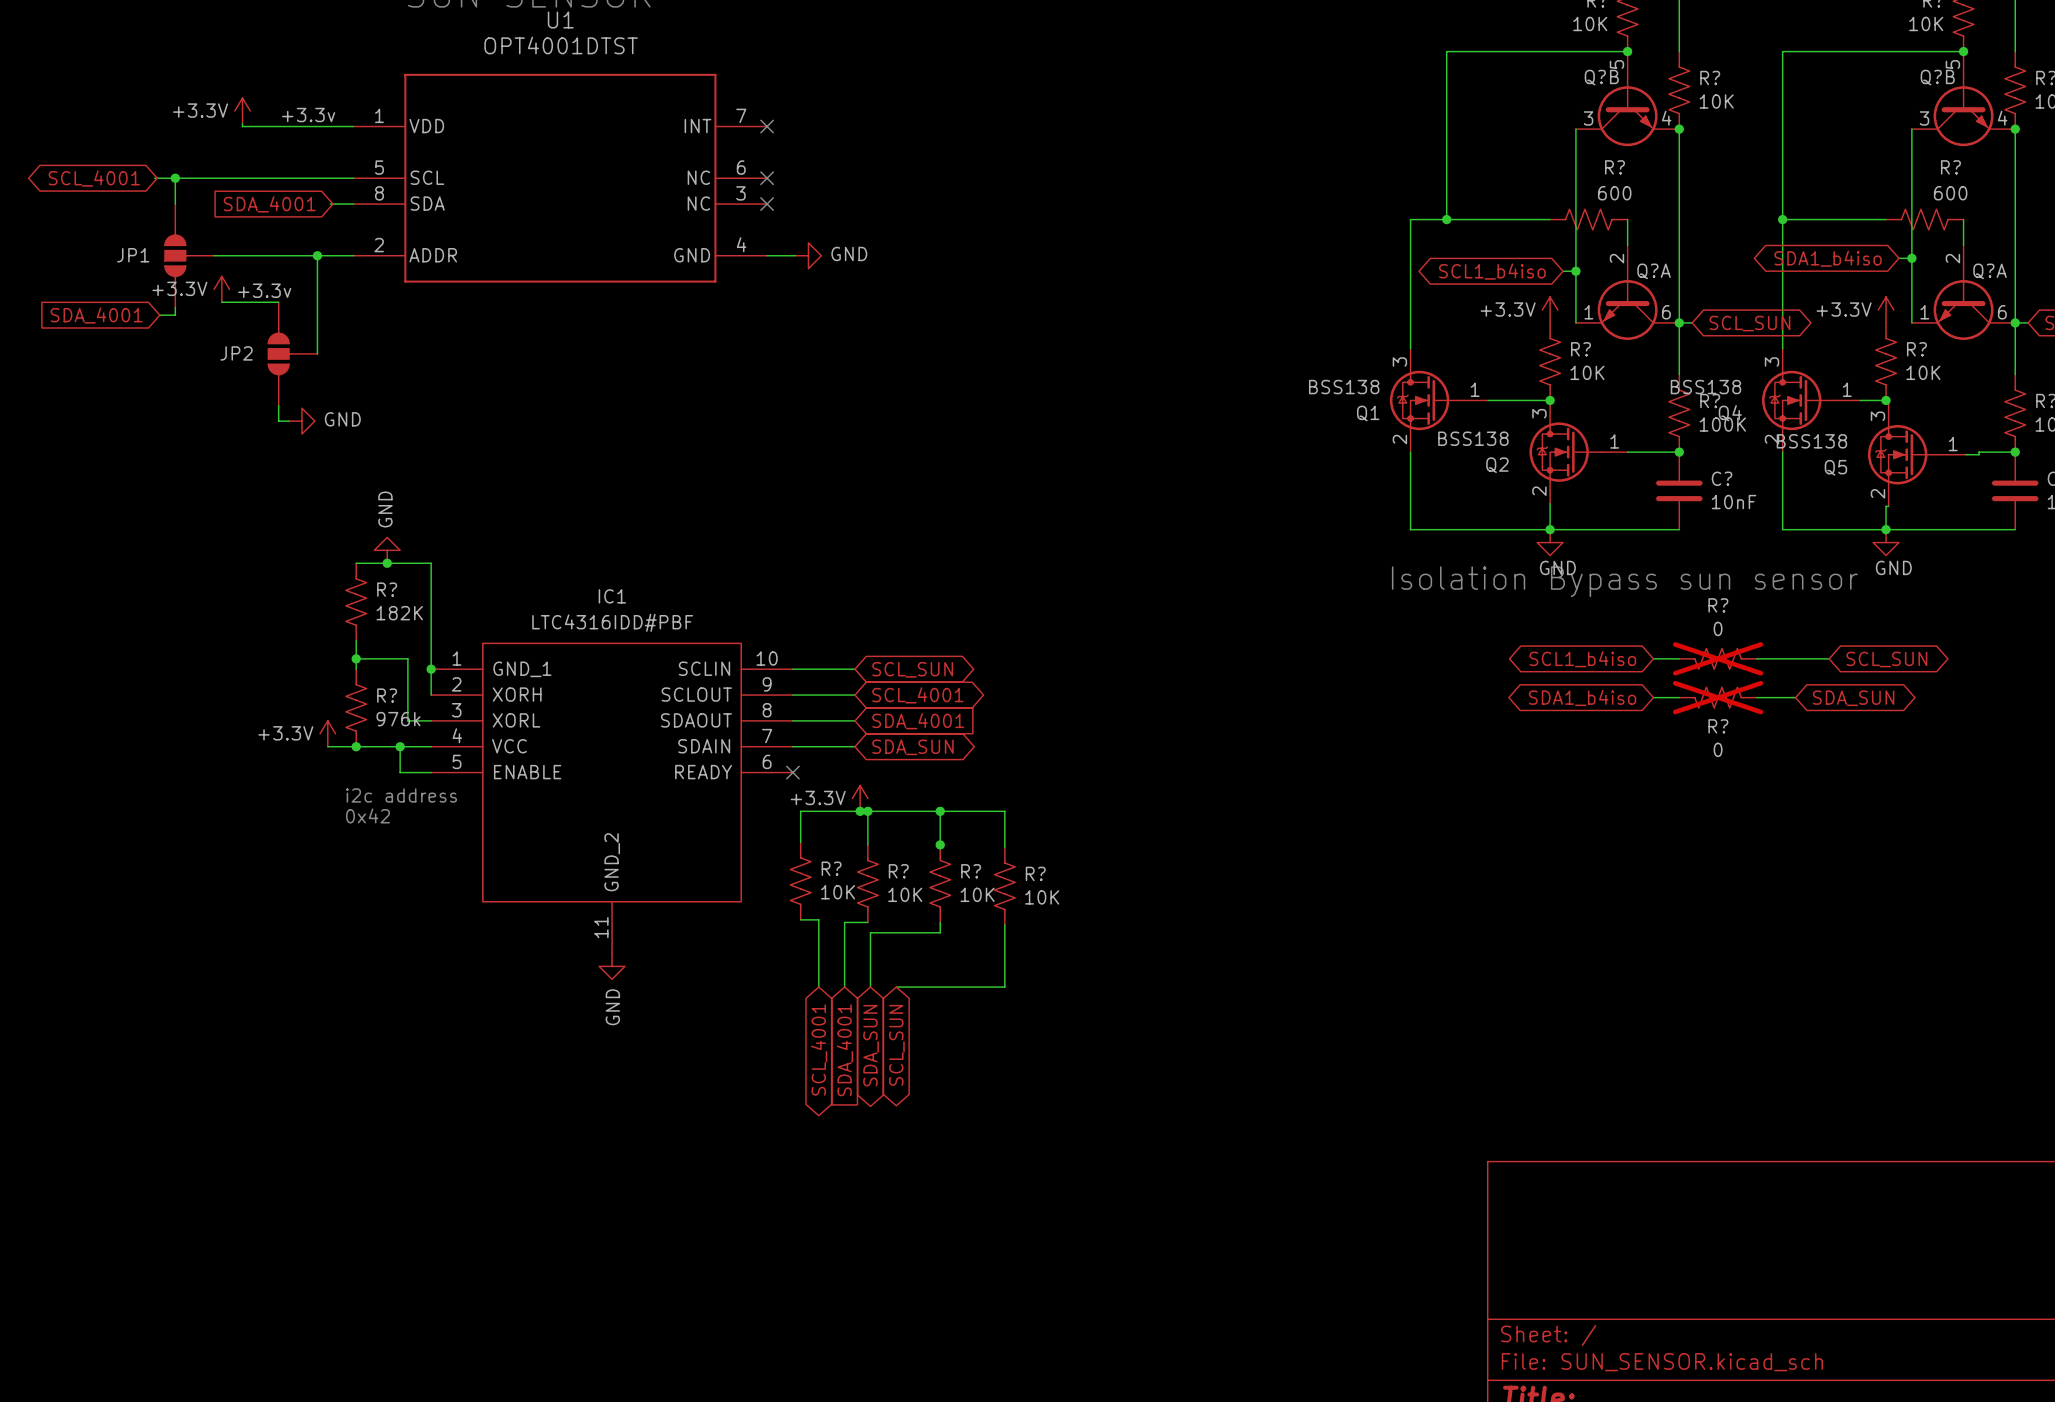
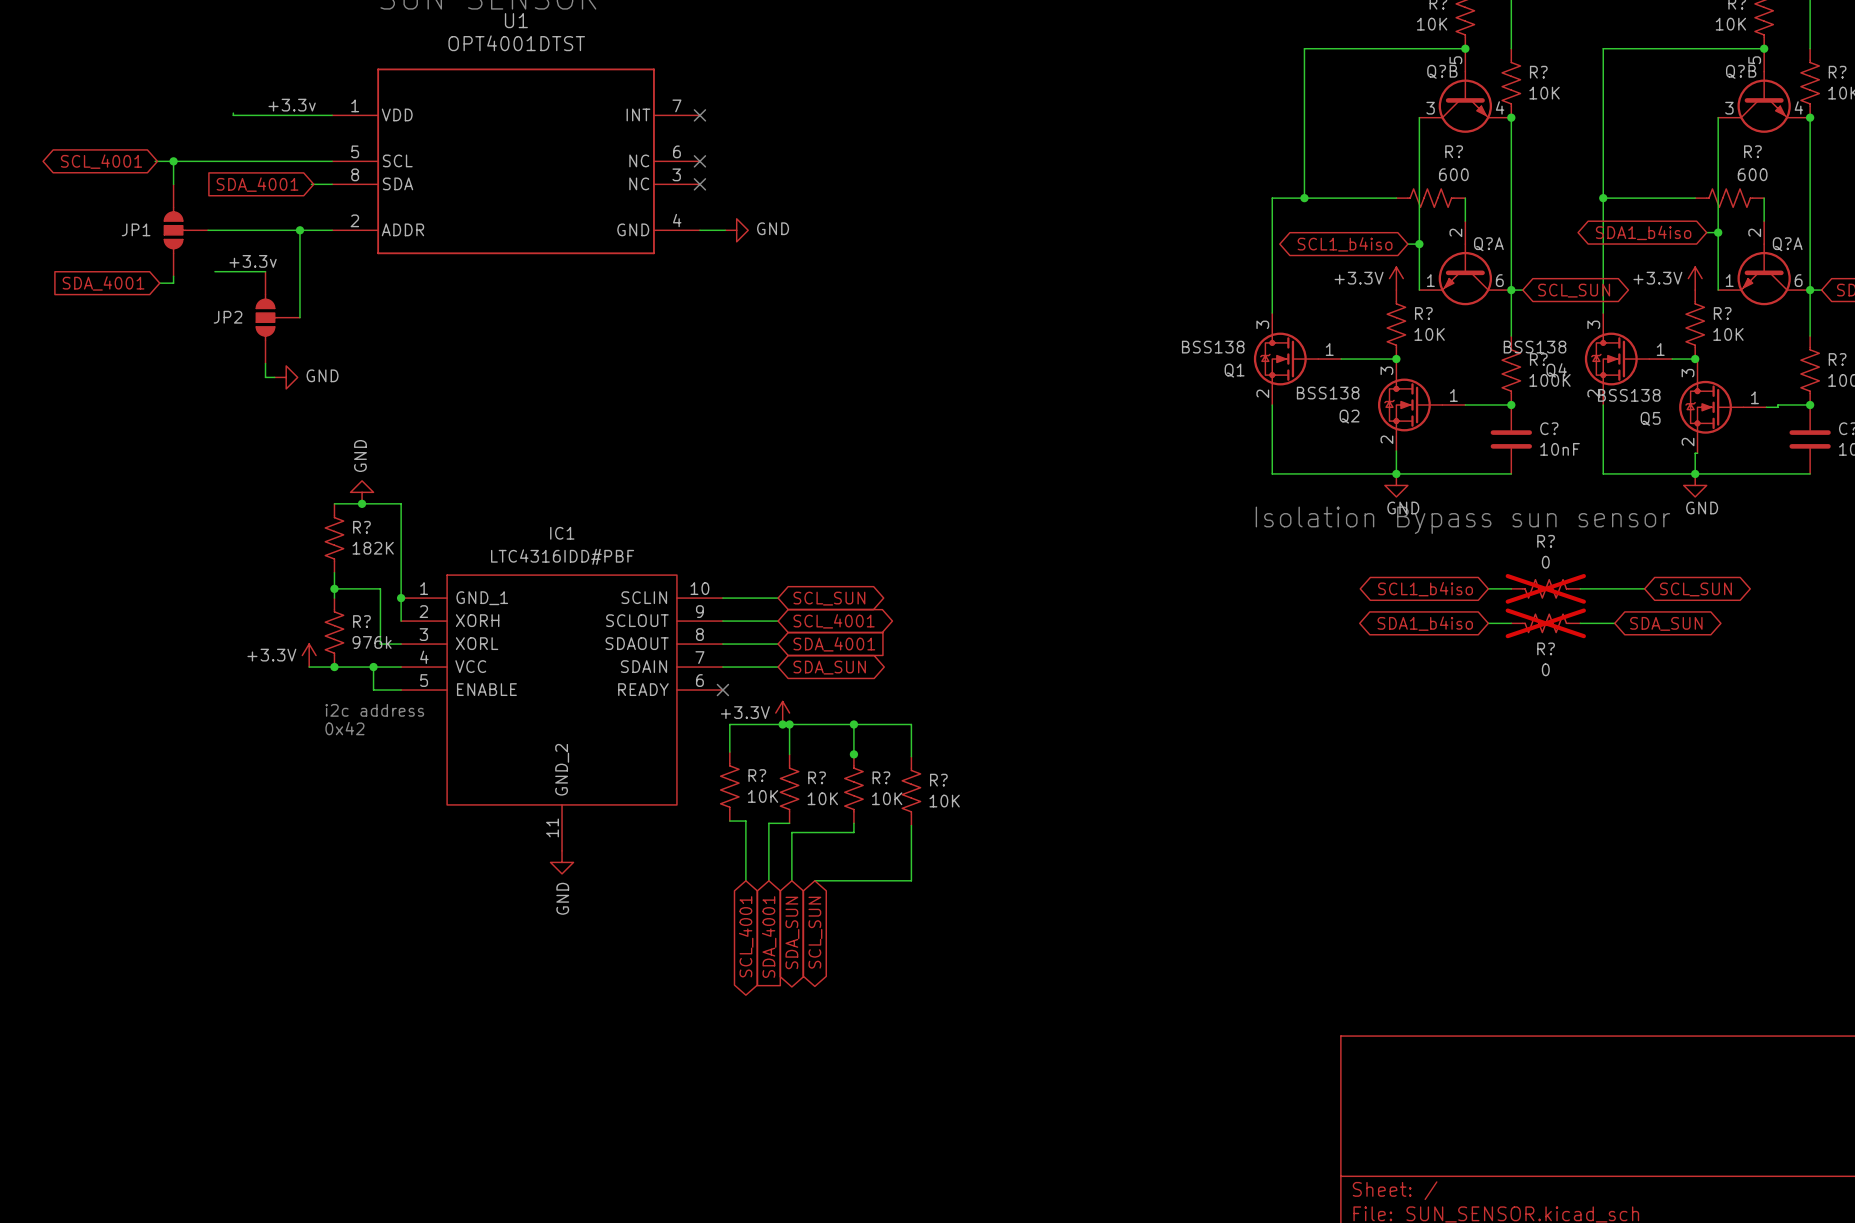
power symbol: +3.3V (242, 111) -> none
power symbol: +3.3V (221, 289) -> none

